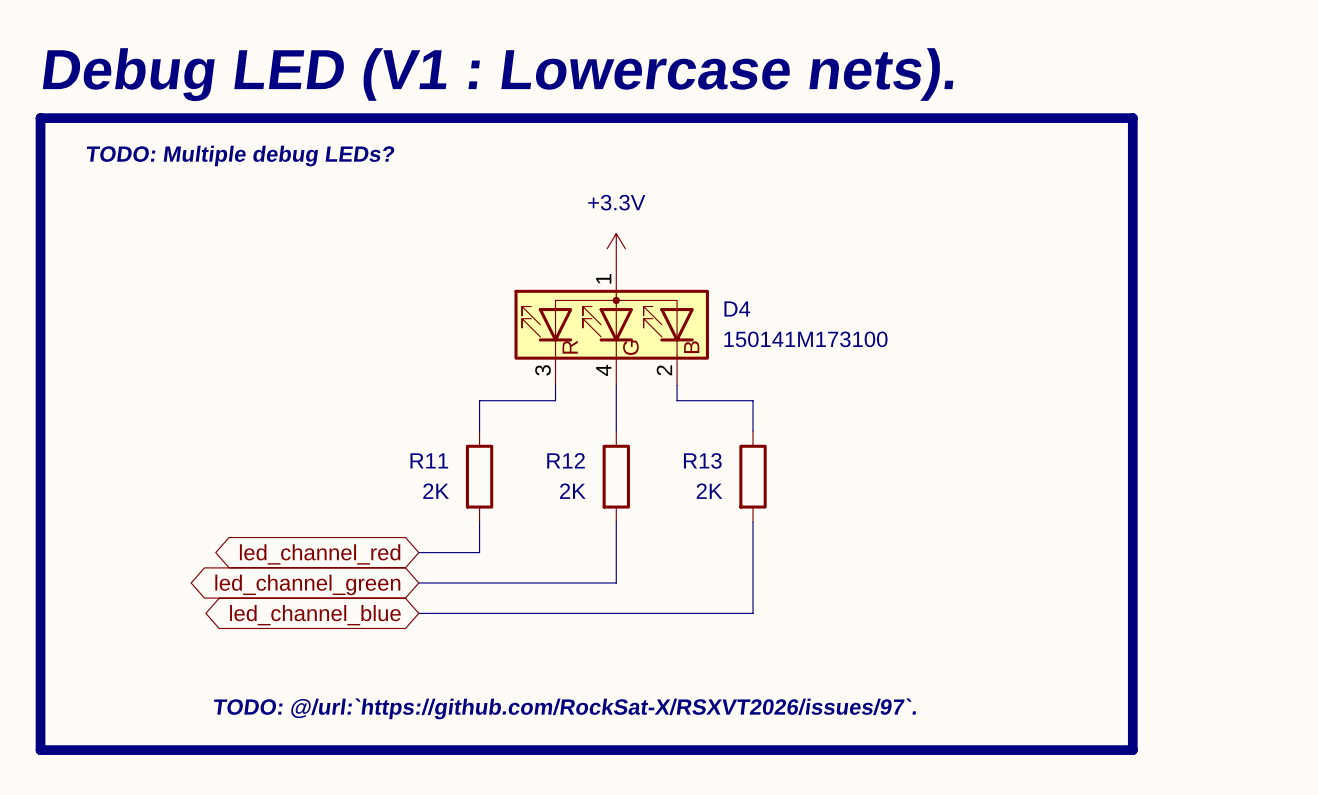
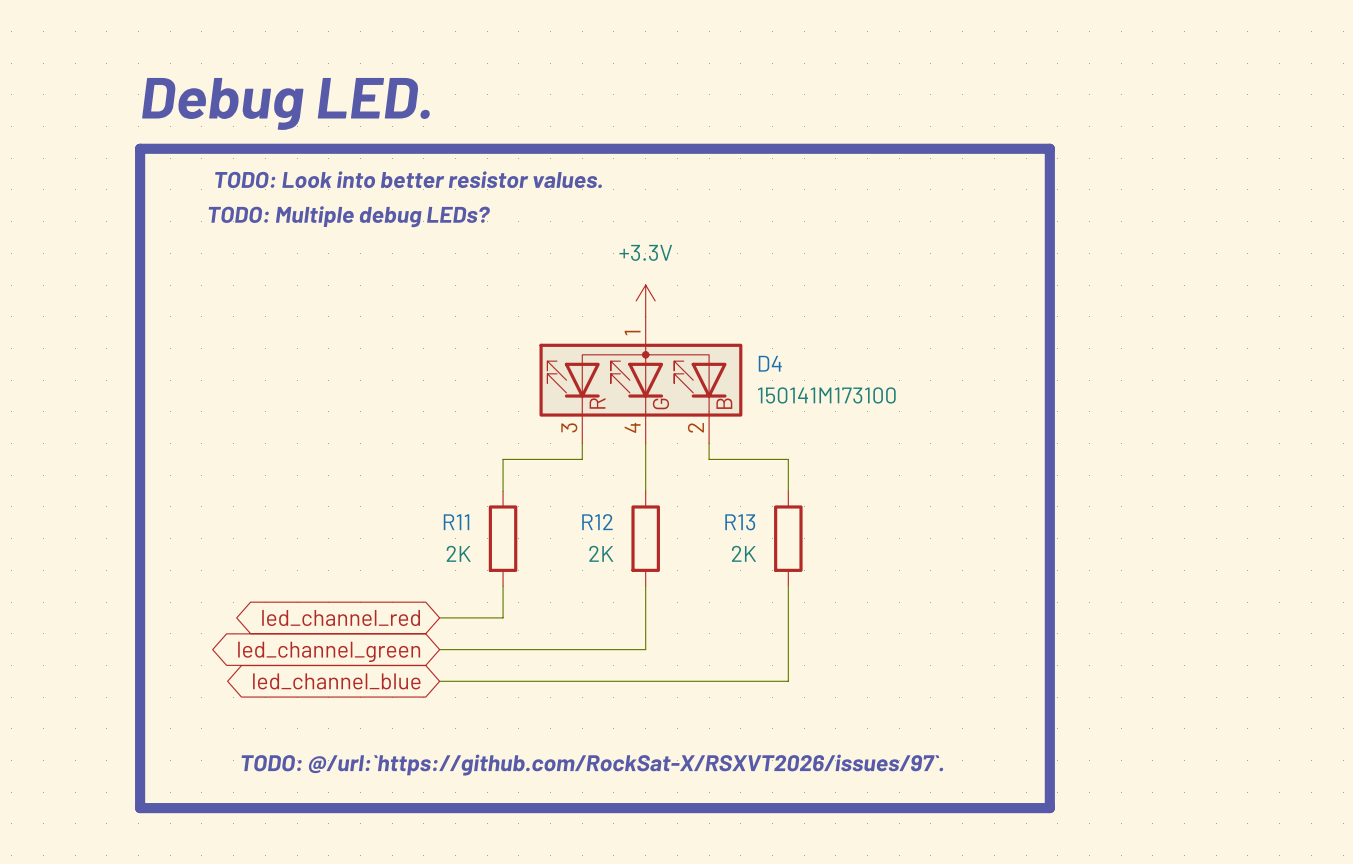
text: none -> Debug LED. (286, 103)
text: Debug LED (V1 : Lowercase nets). (498, 74) -> none
line: (40, 118) (1132, 118) (1132, 750) (40, 750) (40, 118) -> (140, 148) (140, 808) (1049, 808) (1049, 148) (140, 148)
text: none -> TODO: Look into better resistor values. (408, 179)
text position: TODO: Multiple debug LEDs? (240, 156) -> TODO: Multiple debug LEDs? (349, 216)
text position: TODO: @/url:`https://github.com/RockSat-X/RSXVT2026/issues/97`. (565, 708) -> TODO: @/url:`https://github.com/RockSat-X/RSXVT2026/issues/97`. (592, 765)

